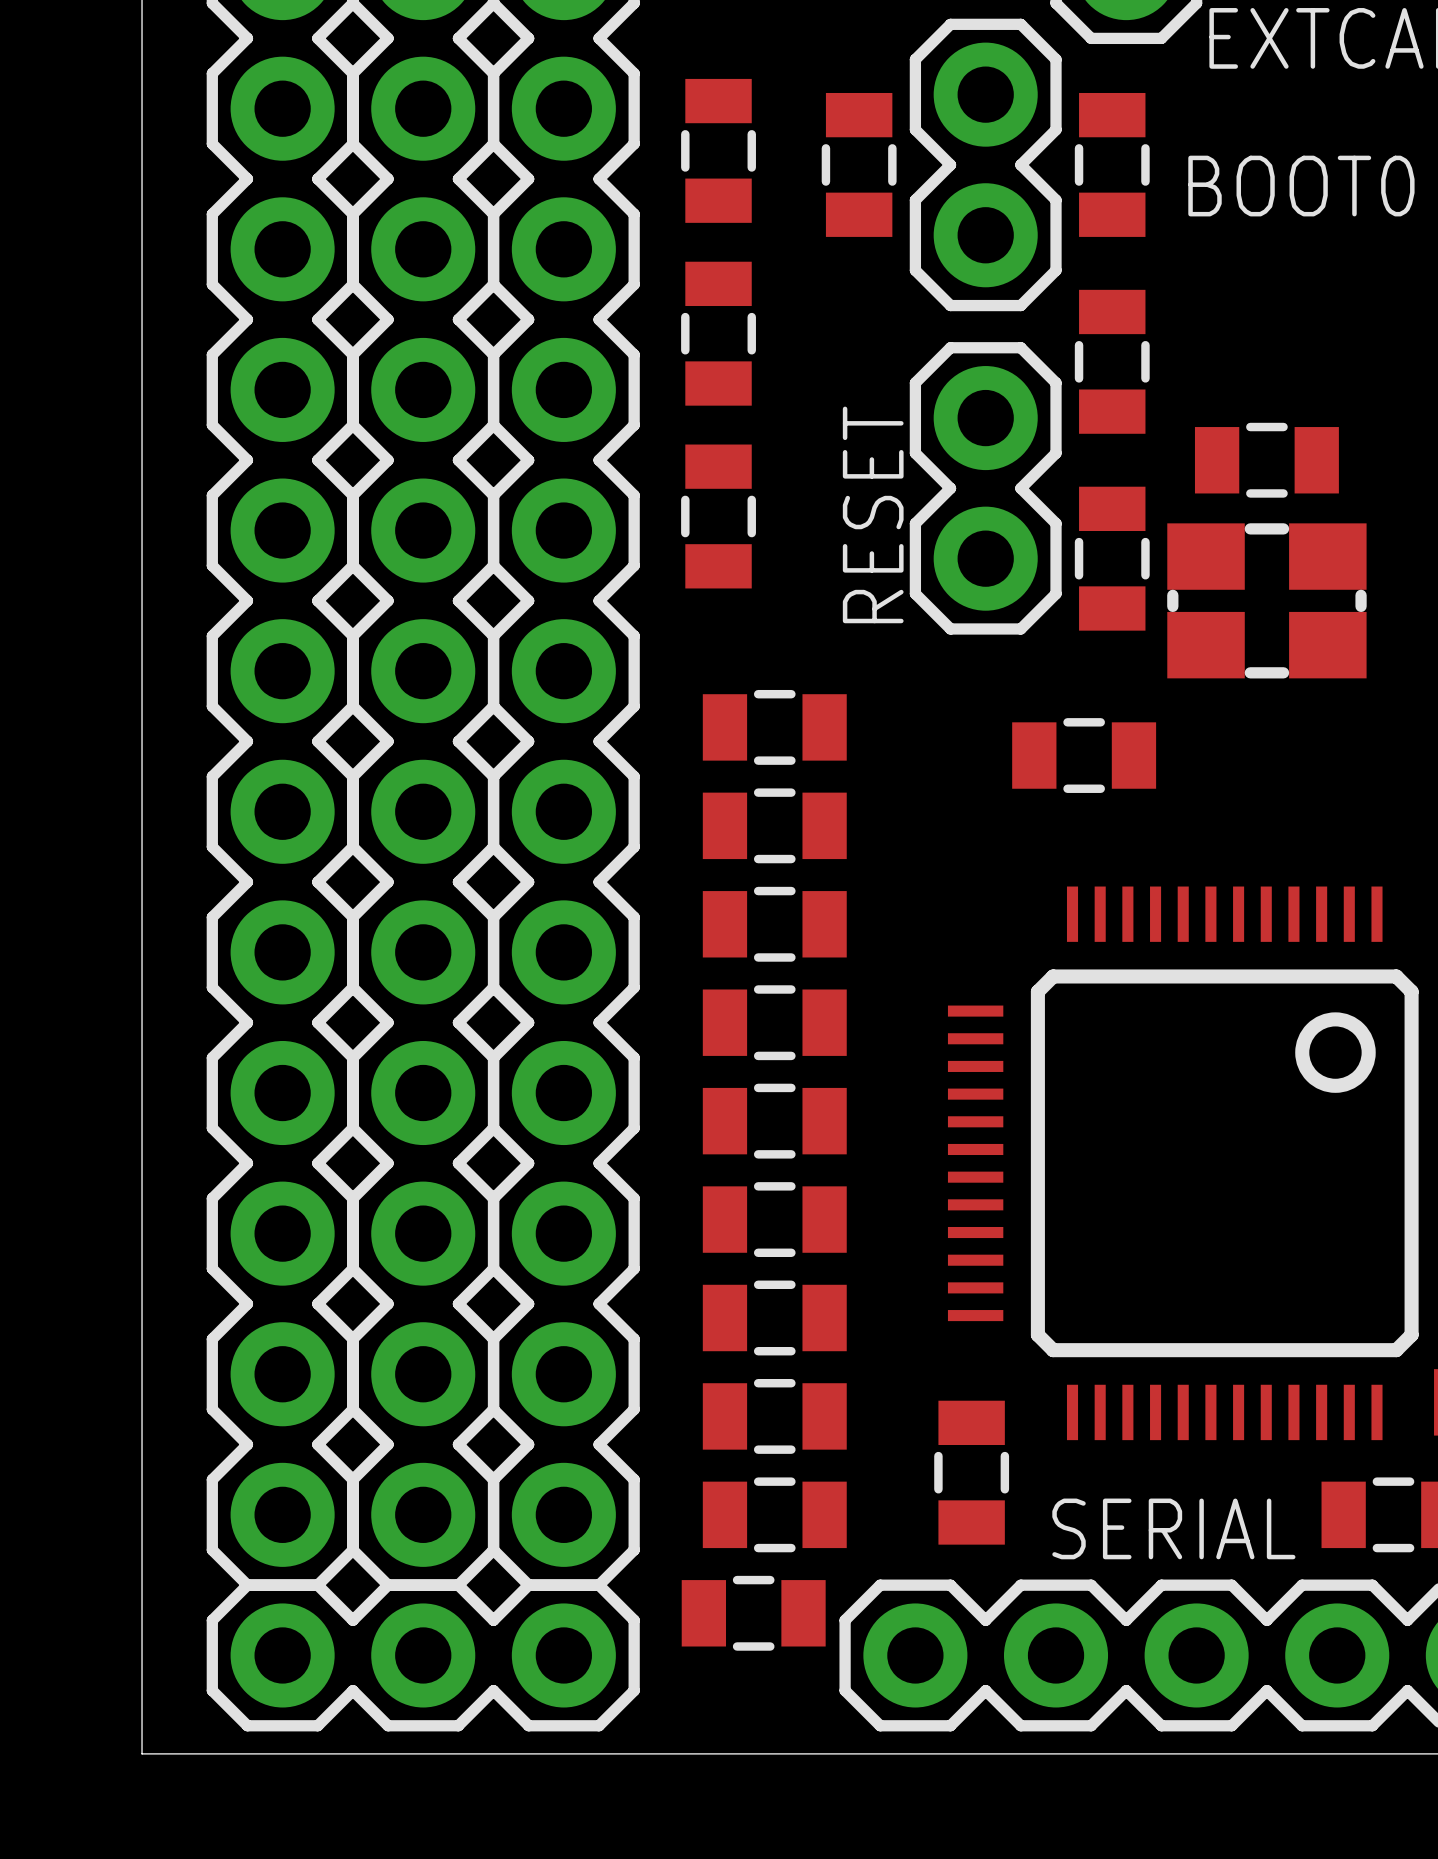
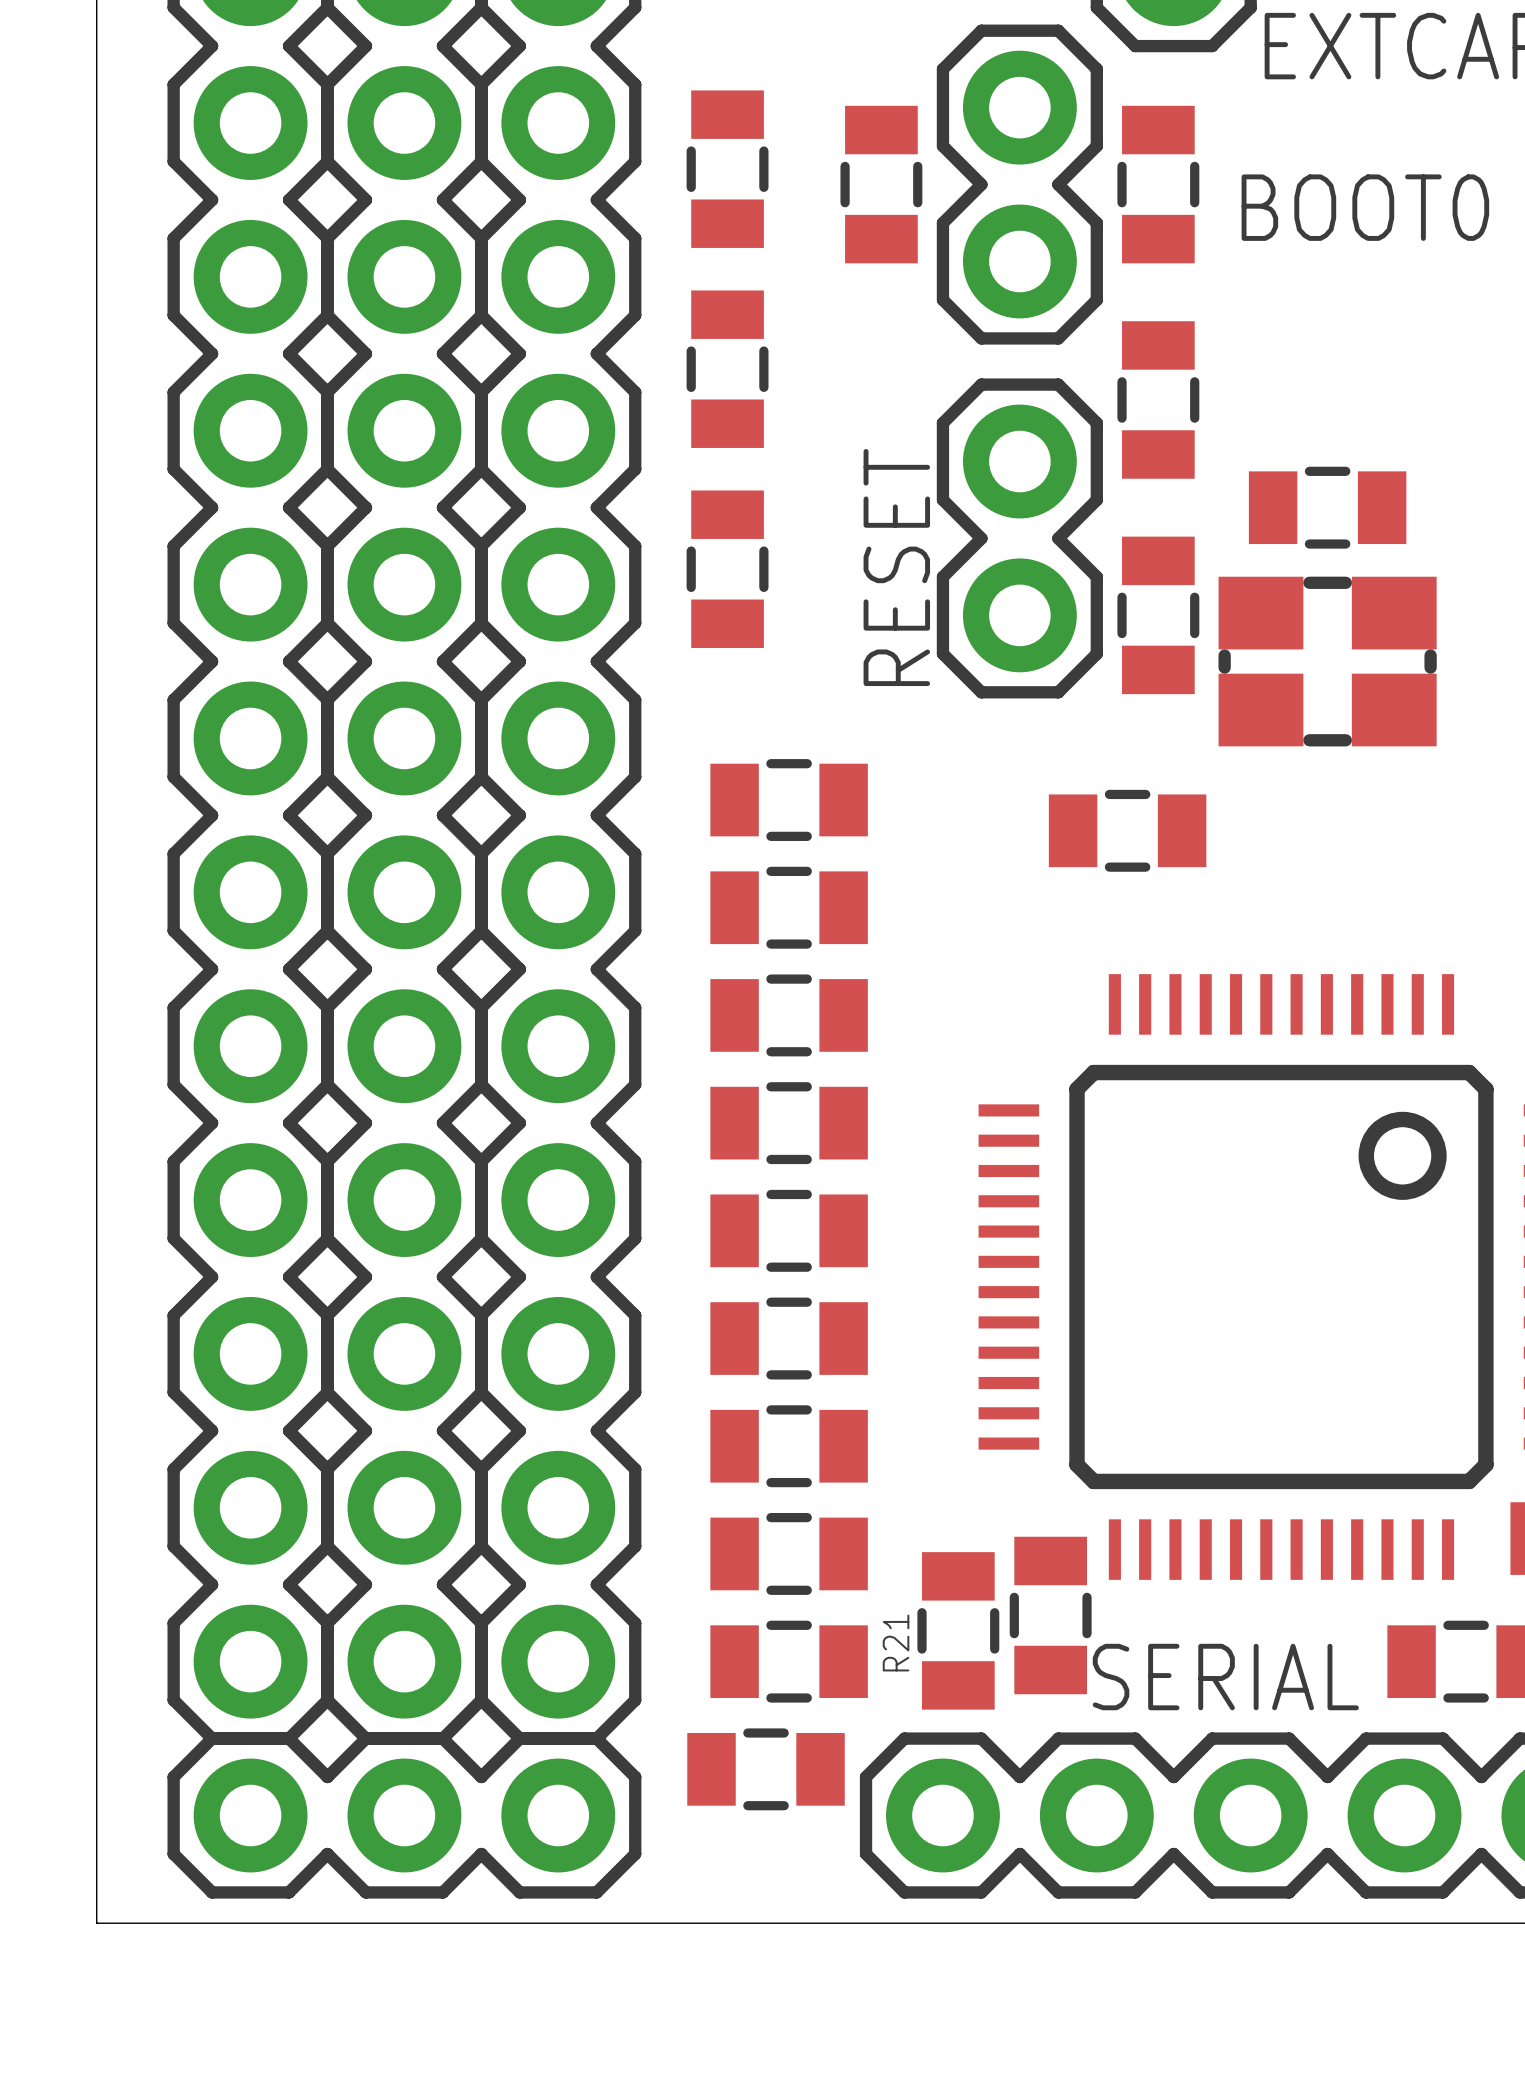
part position: (971, 1472) -> (1050, 1615)
R21: none -> (958, 1630)

